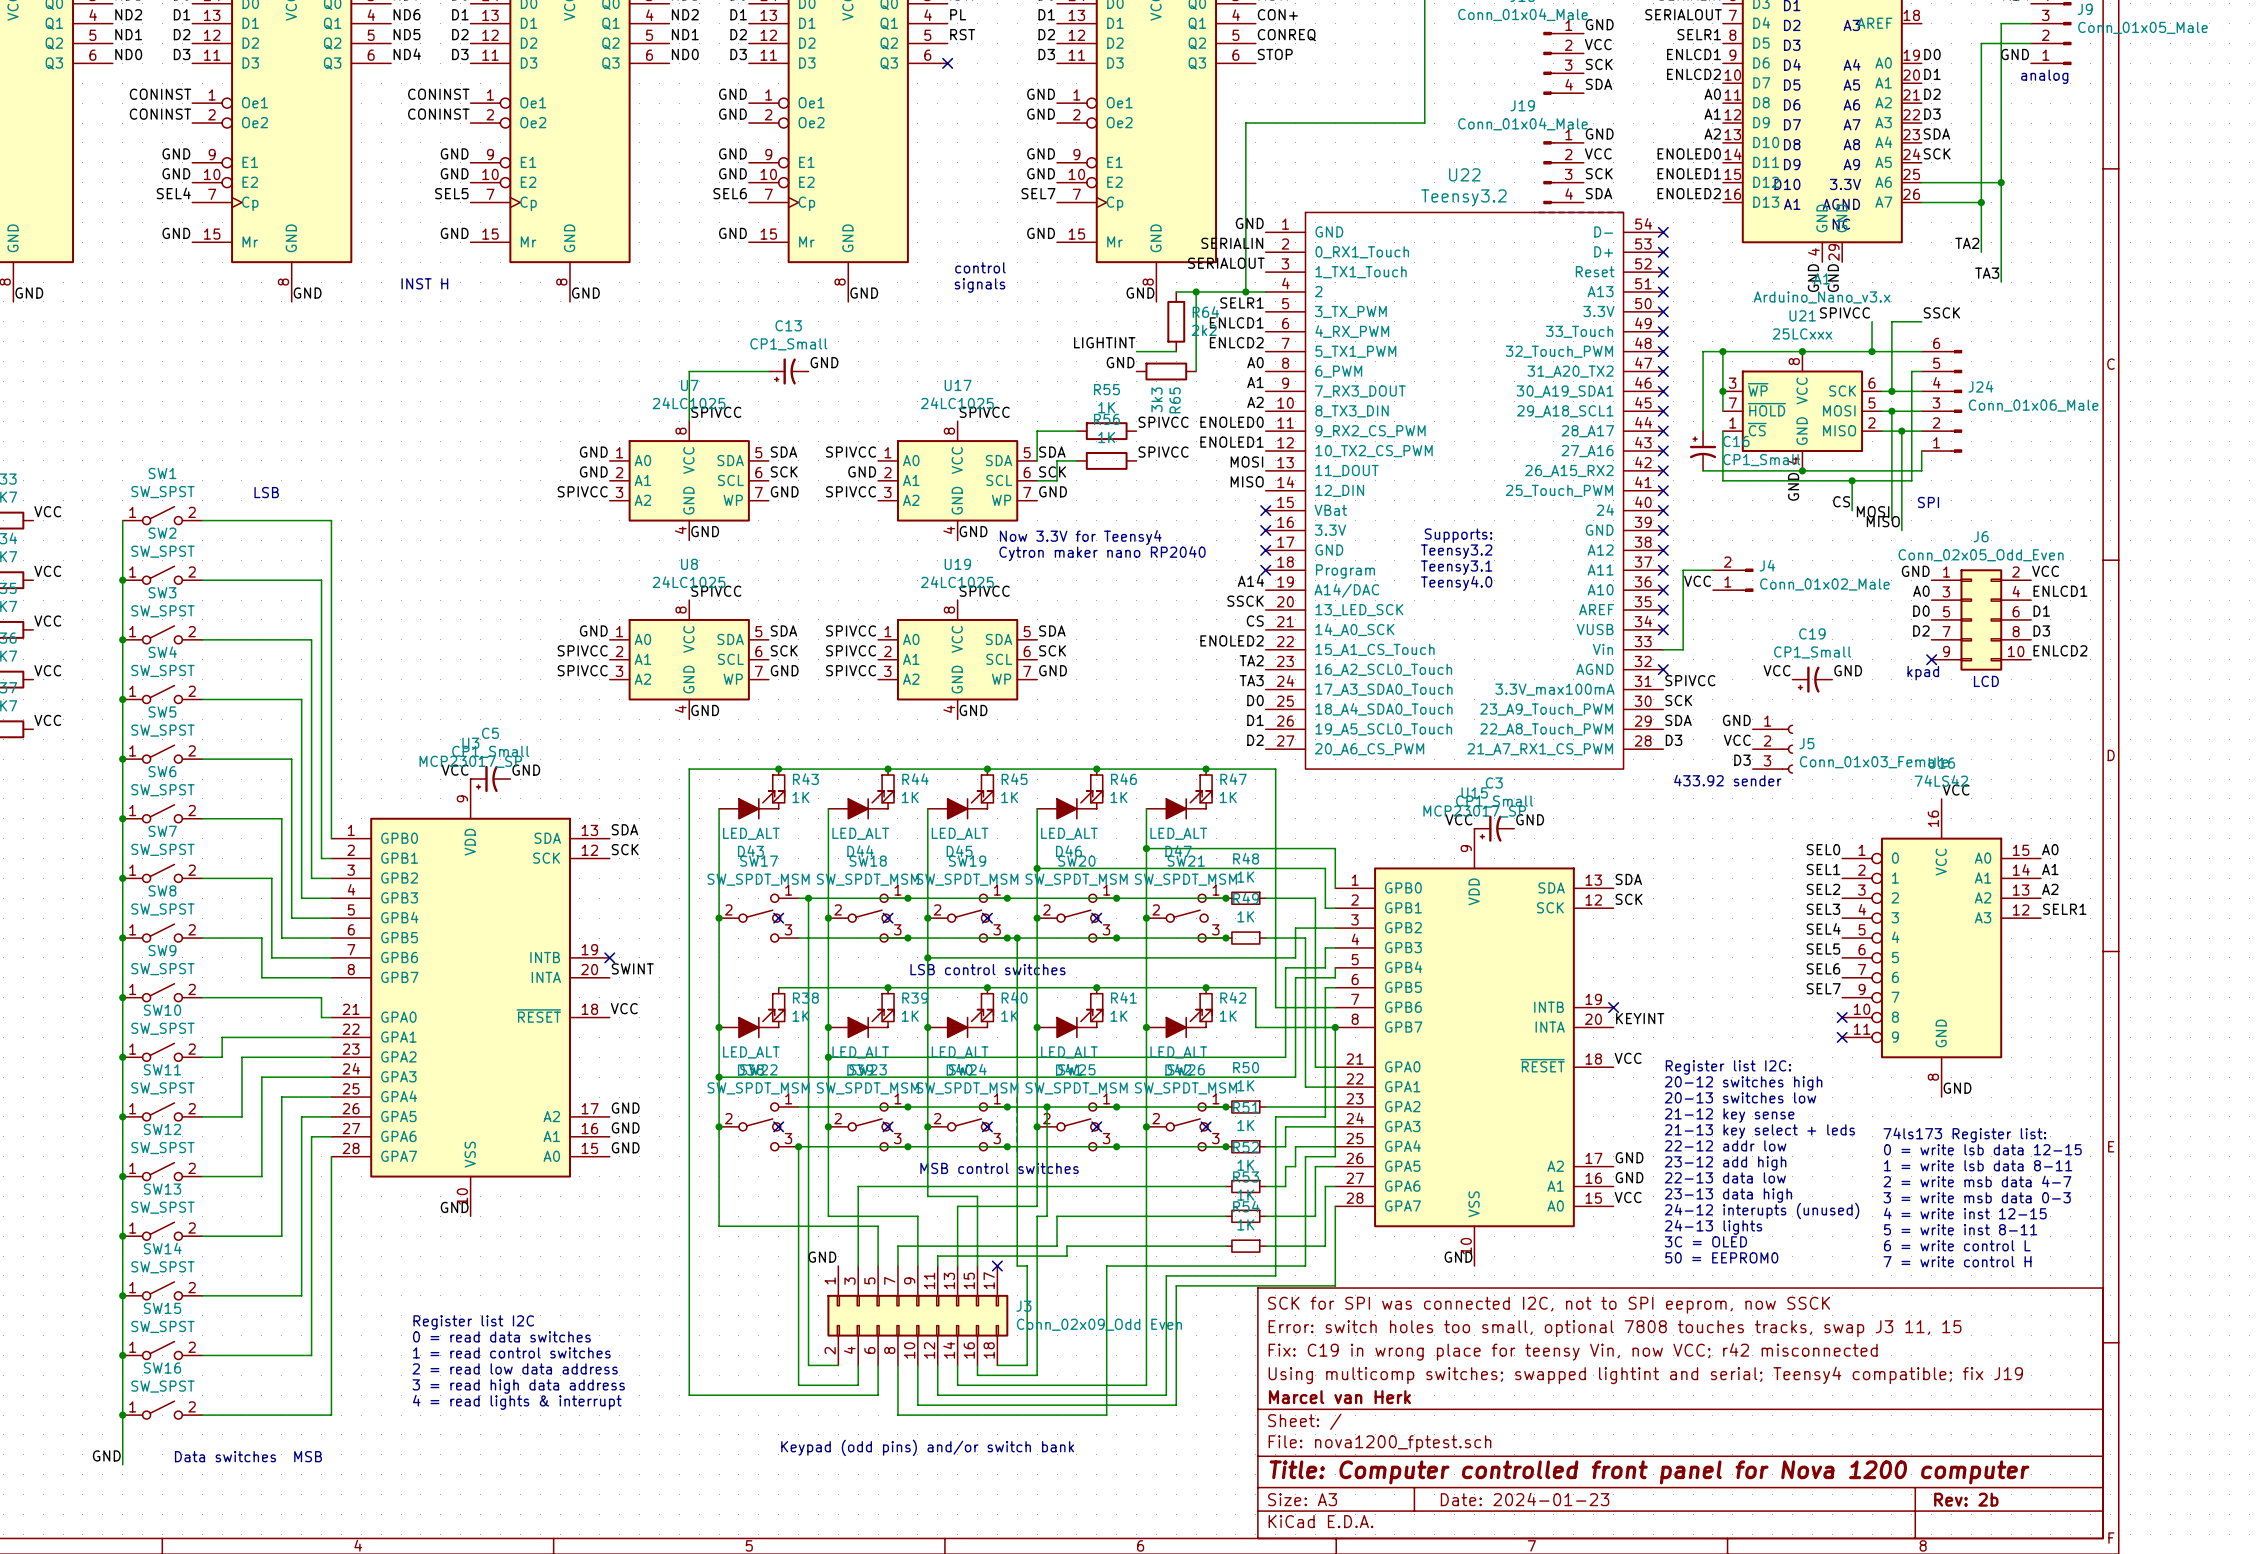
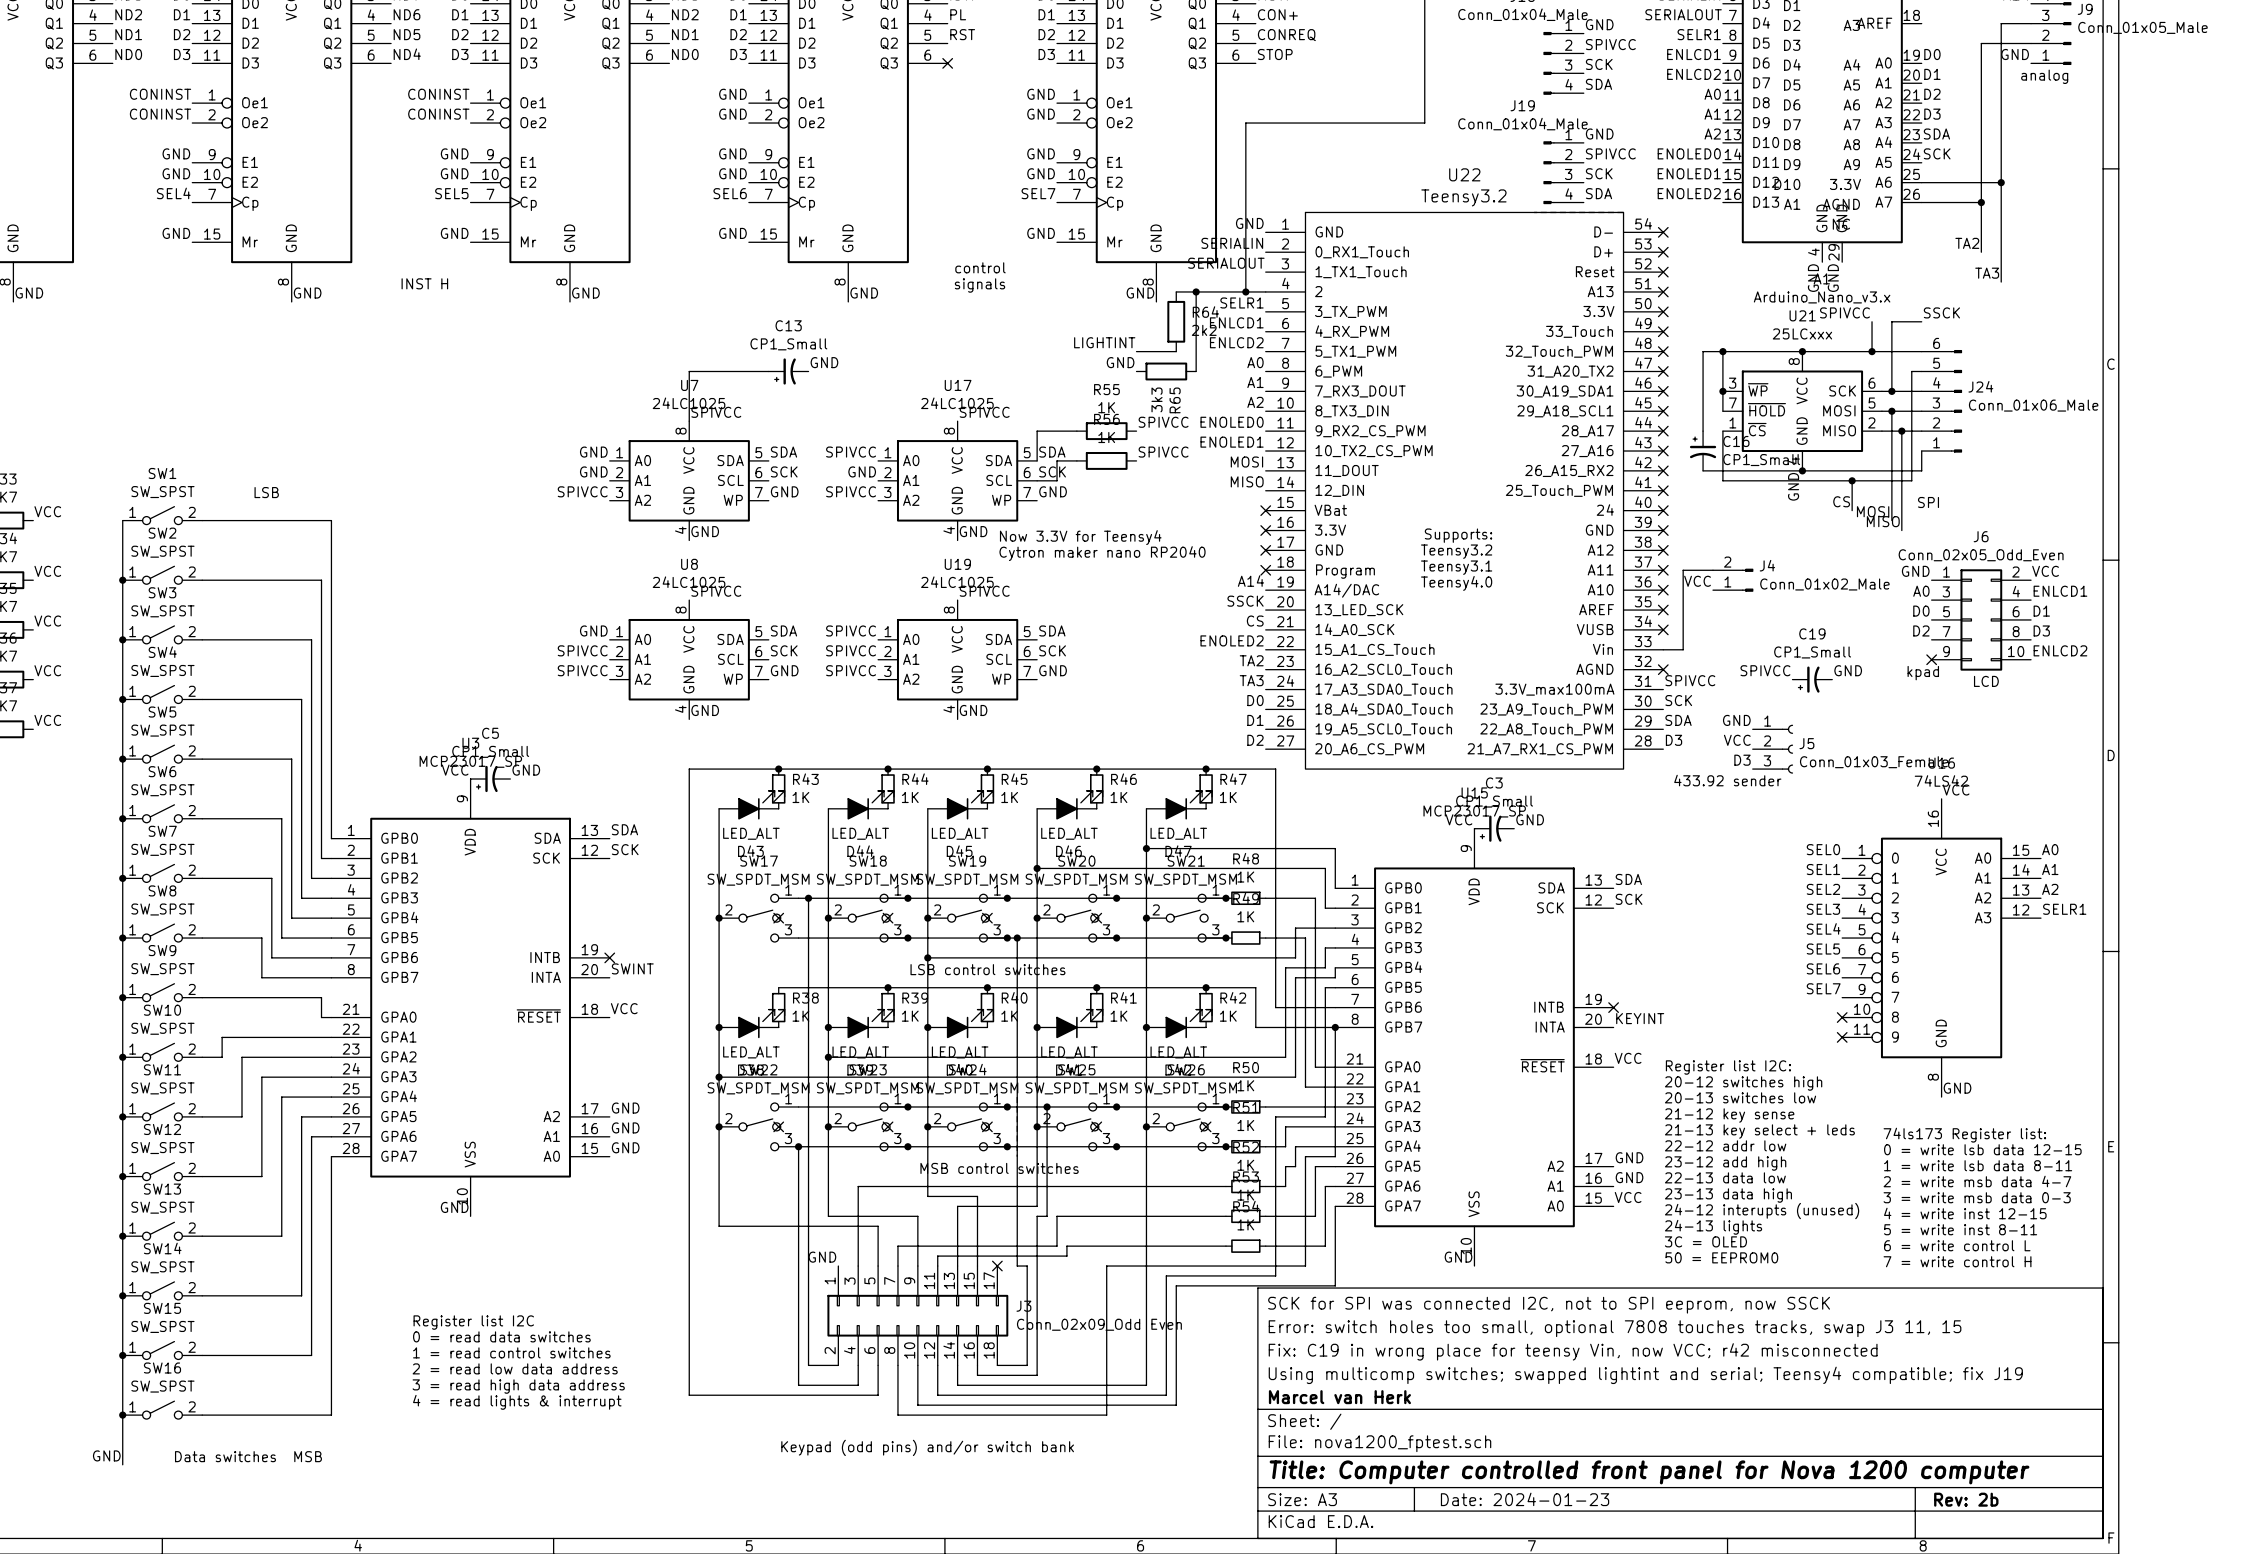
label: VCC (1598, 44) -> SPIVCC (1610, 44)
label: VCC (1598, 153) -> SPIVCC (1610, 153)
label: VCC (1777, 670) -> SPIVCC (1765, 670)

